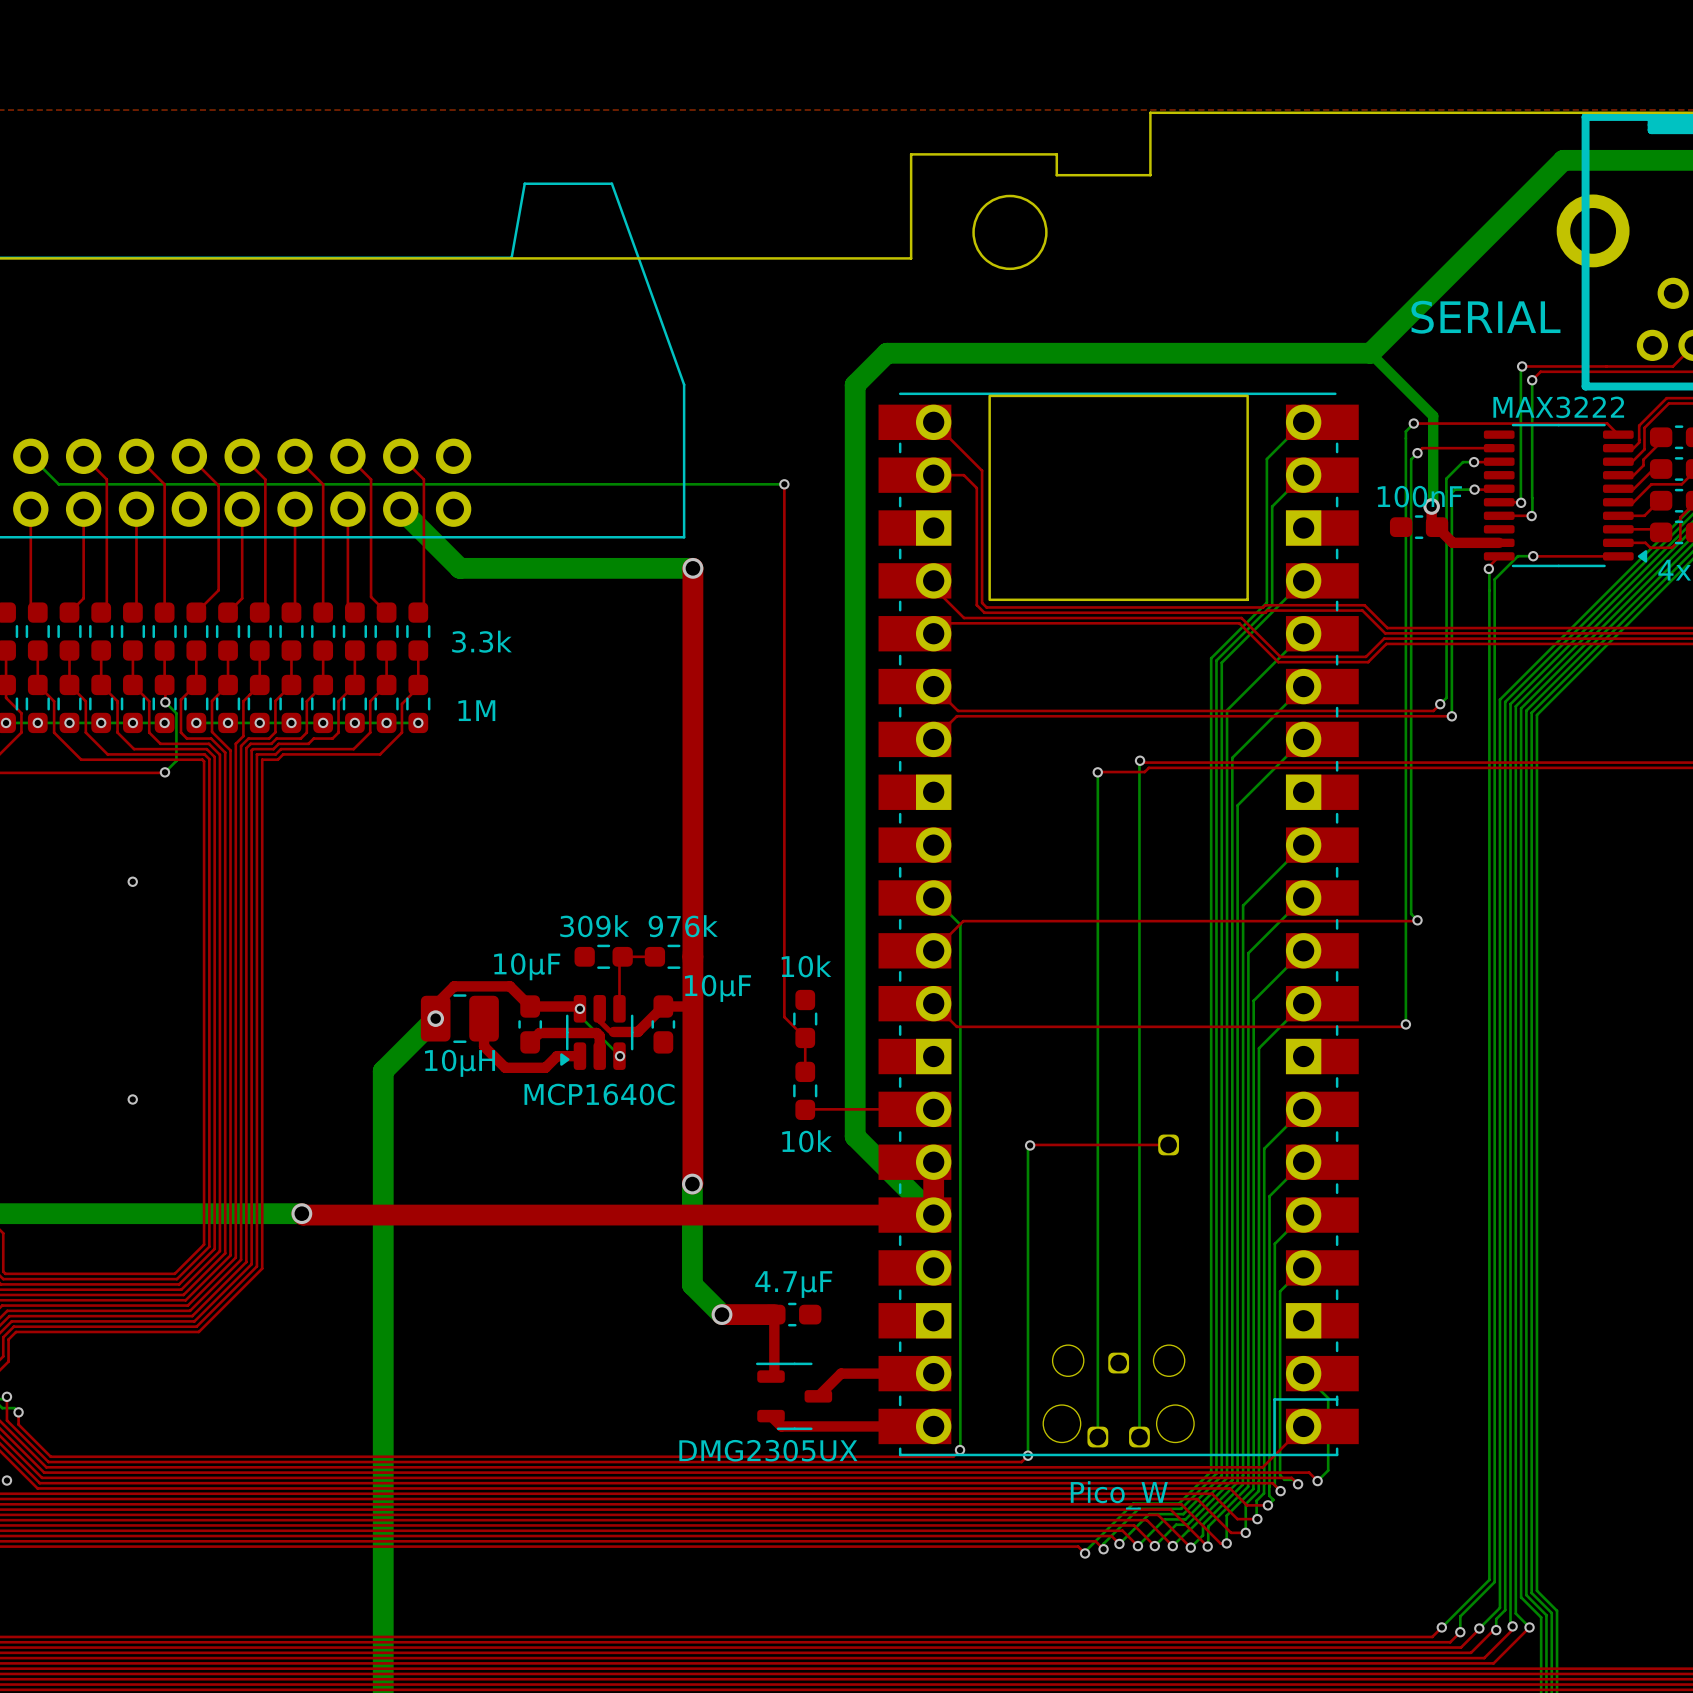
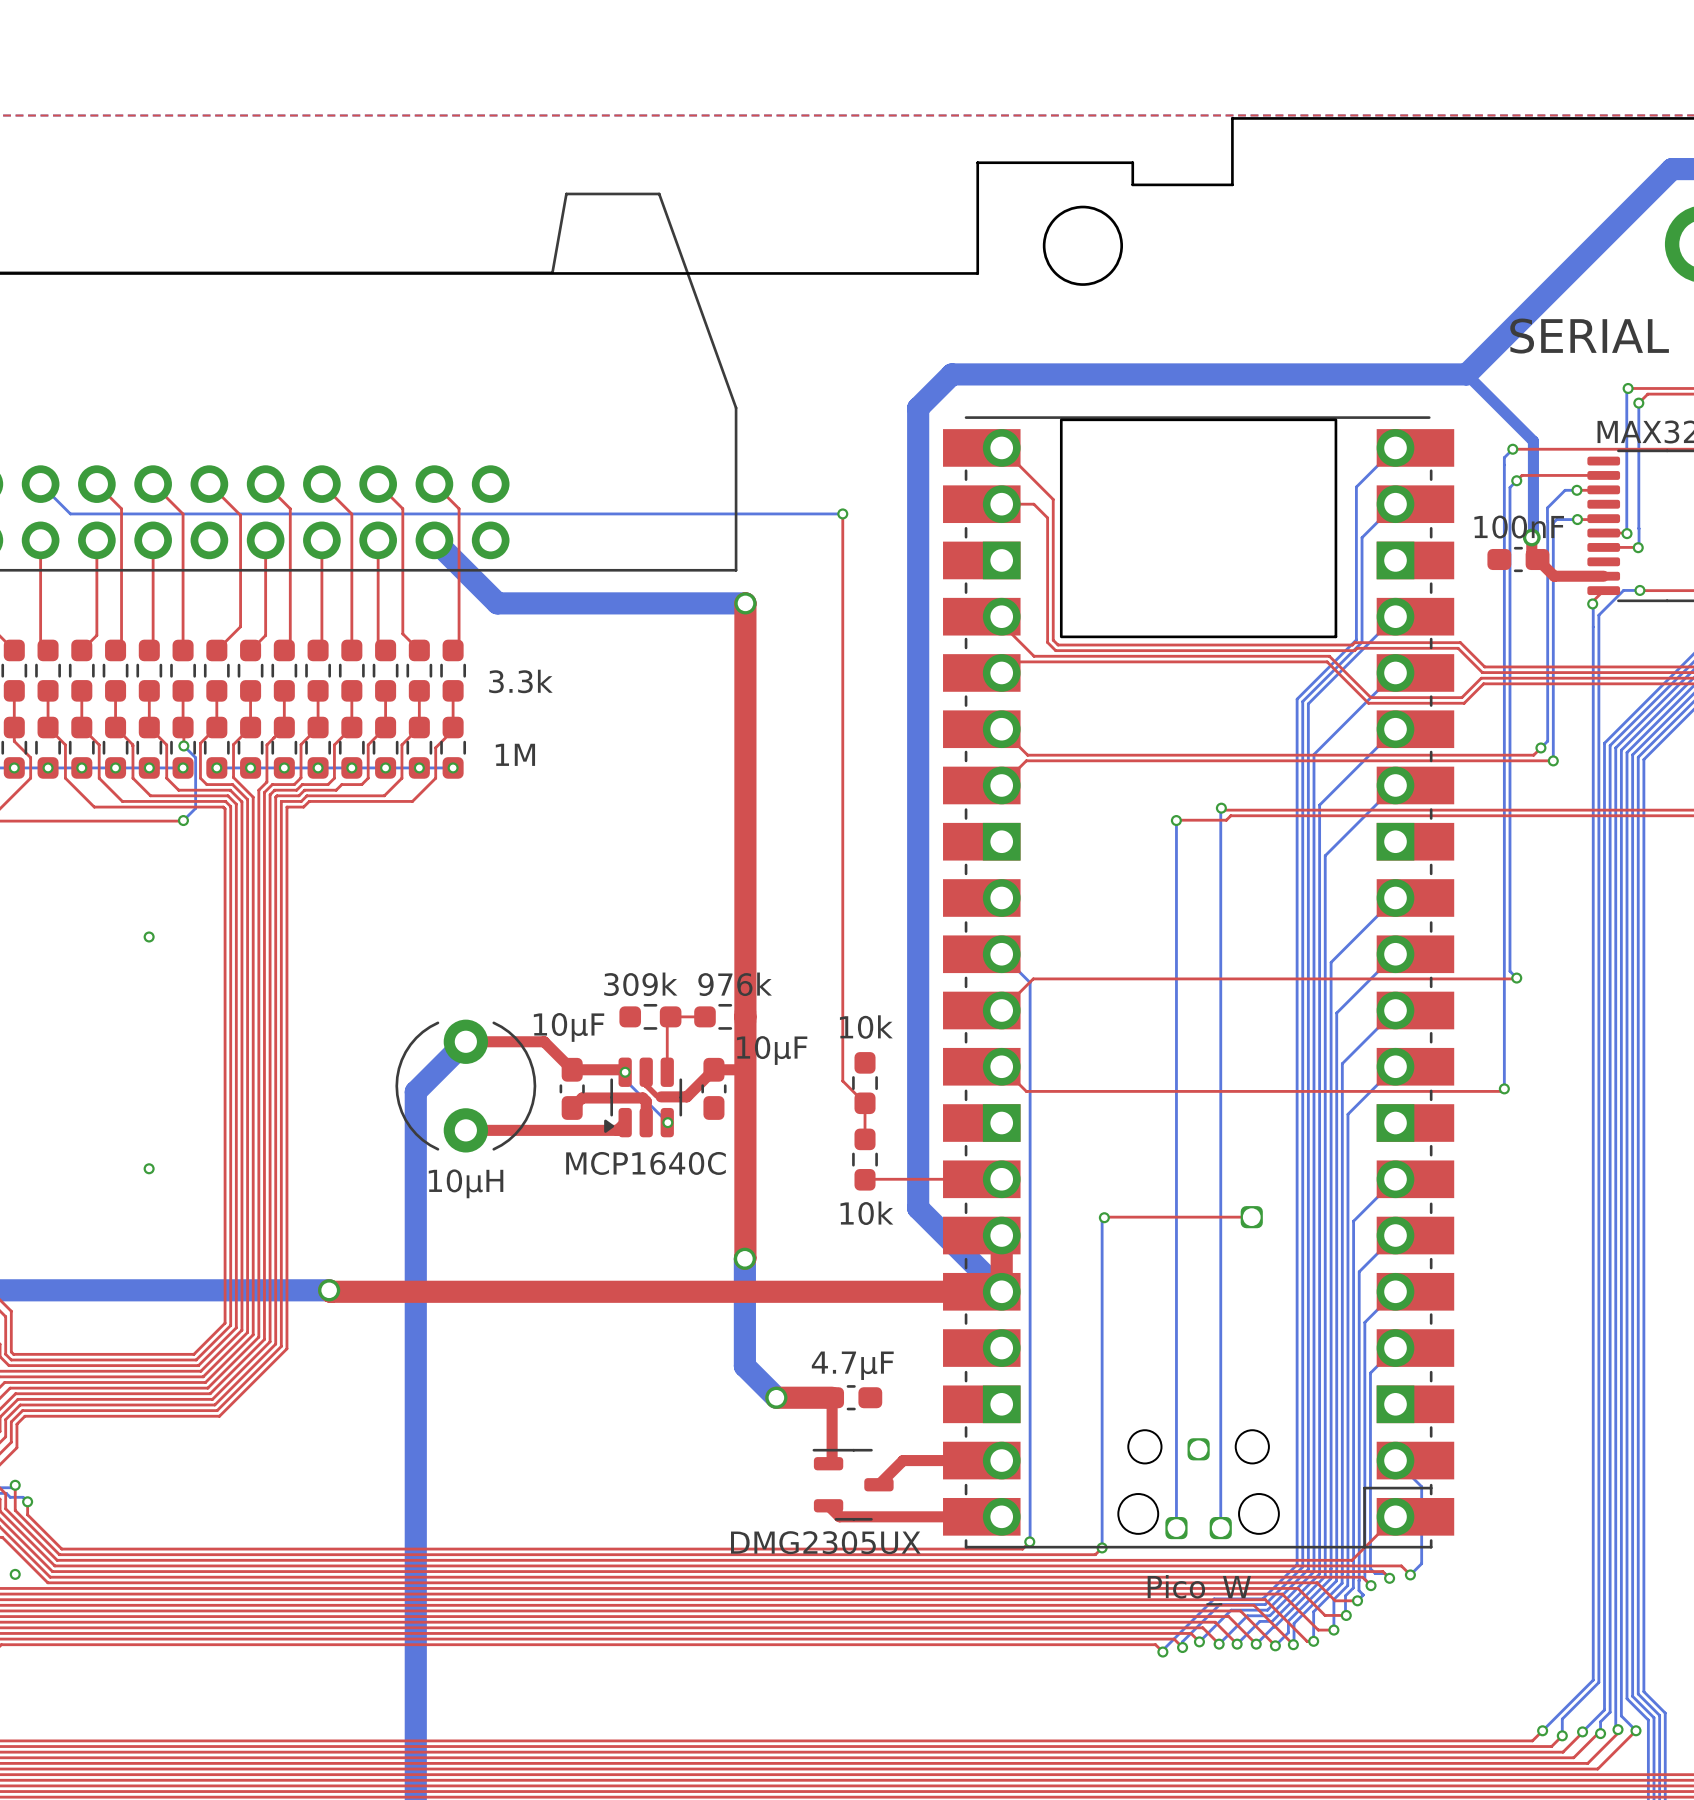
top track: (510, 986) (454, 986) (435, 1004) (435, 1018) -> (550, 1048) (544, 1041) (465, 1041)
bottom track: (435, 1018) (383, 1071) -> (465, 1041) (415, 1091) (415, 1138)
via: (435, 1018) -> none
part: 10µH (459, 1018) -> none
top track: (484, 1018) (484, 1046) (505, 1067) (545, 1067) (557, 1056) (579, 1056) -> (465, 1130) (617, 1130) (625, 1122)
part: none -> 10µH (465, 1086)

